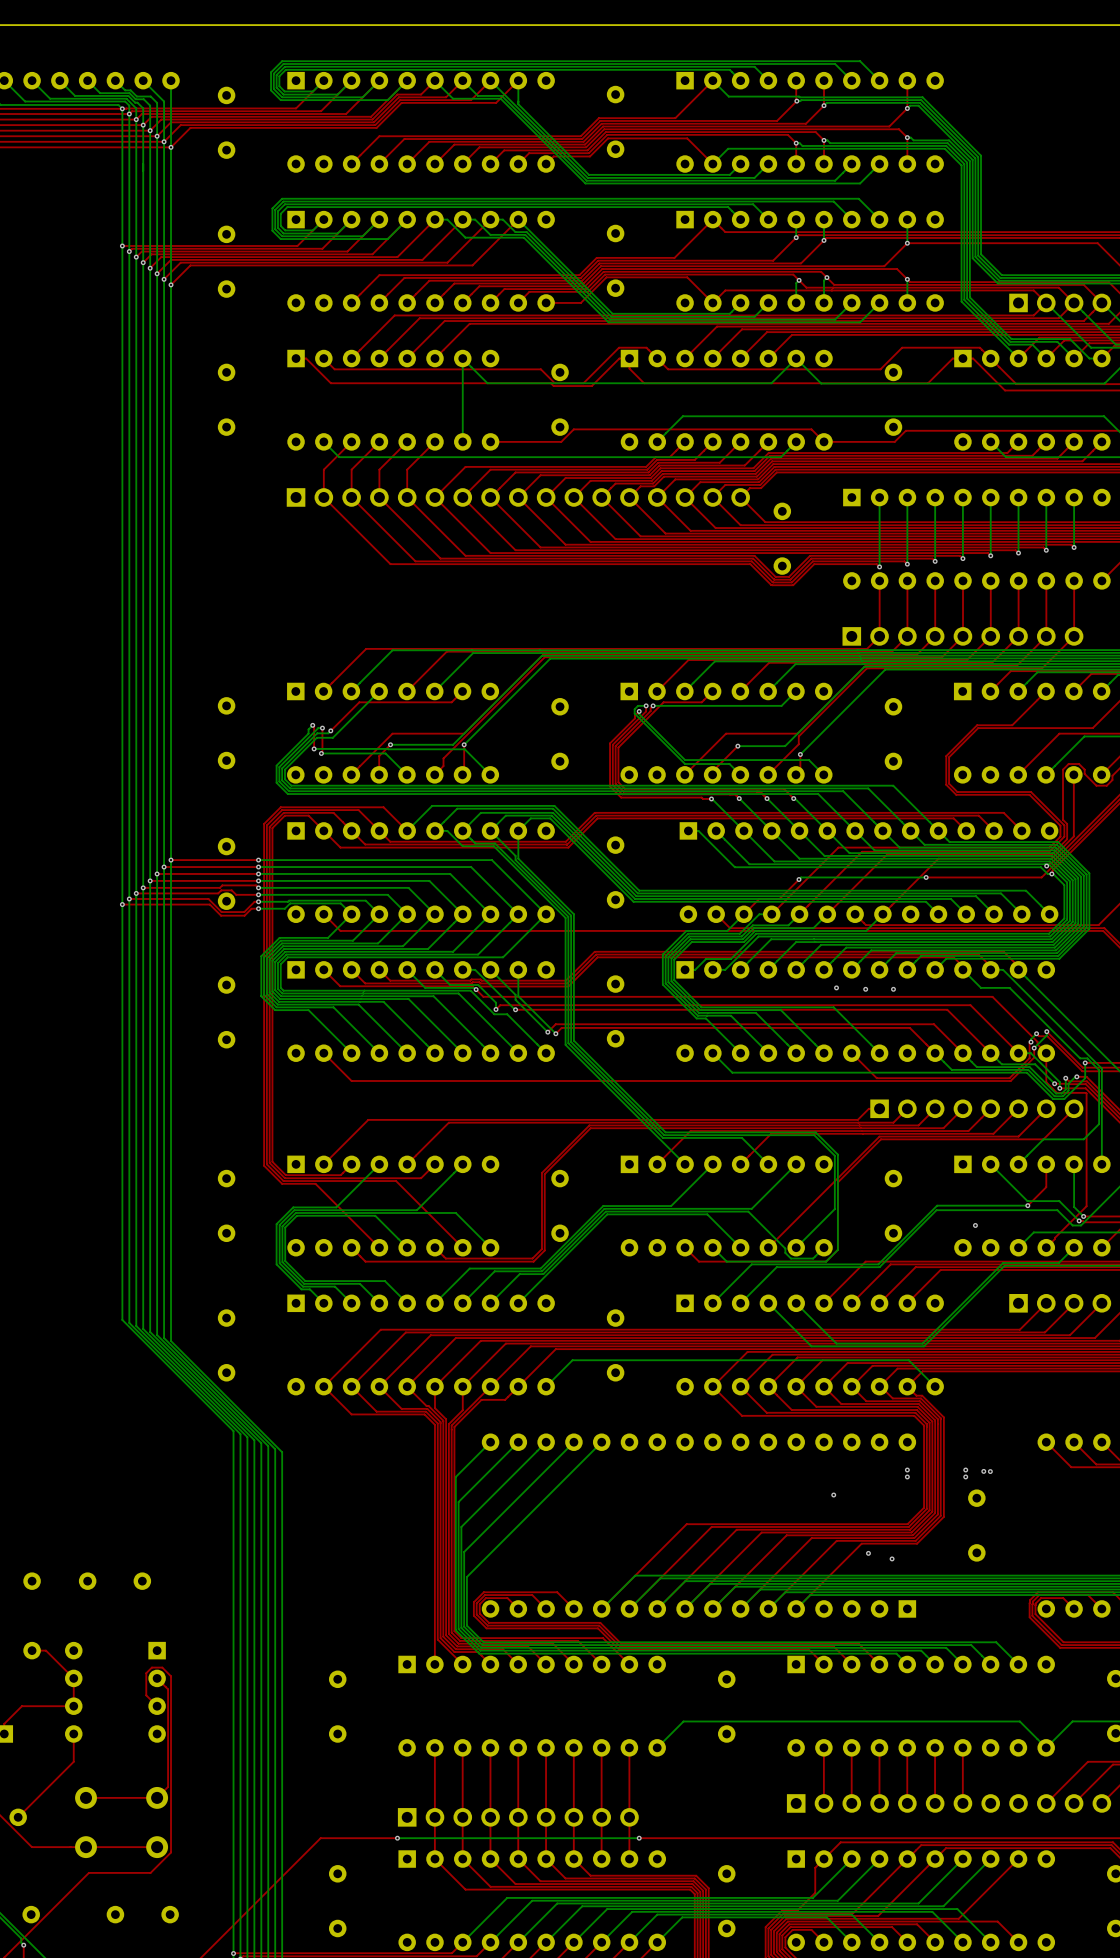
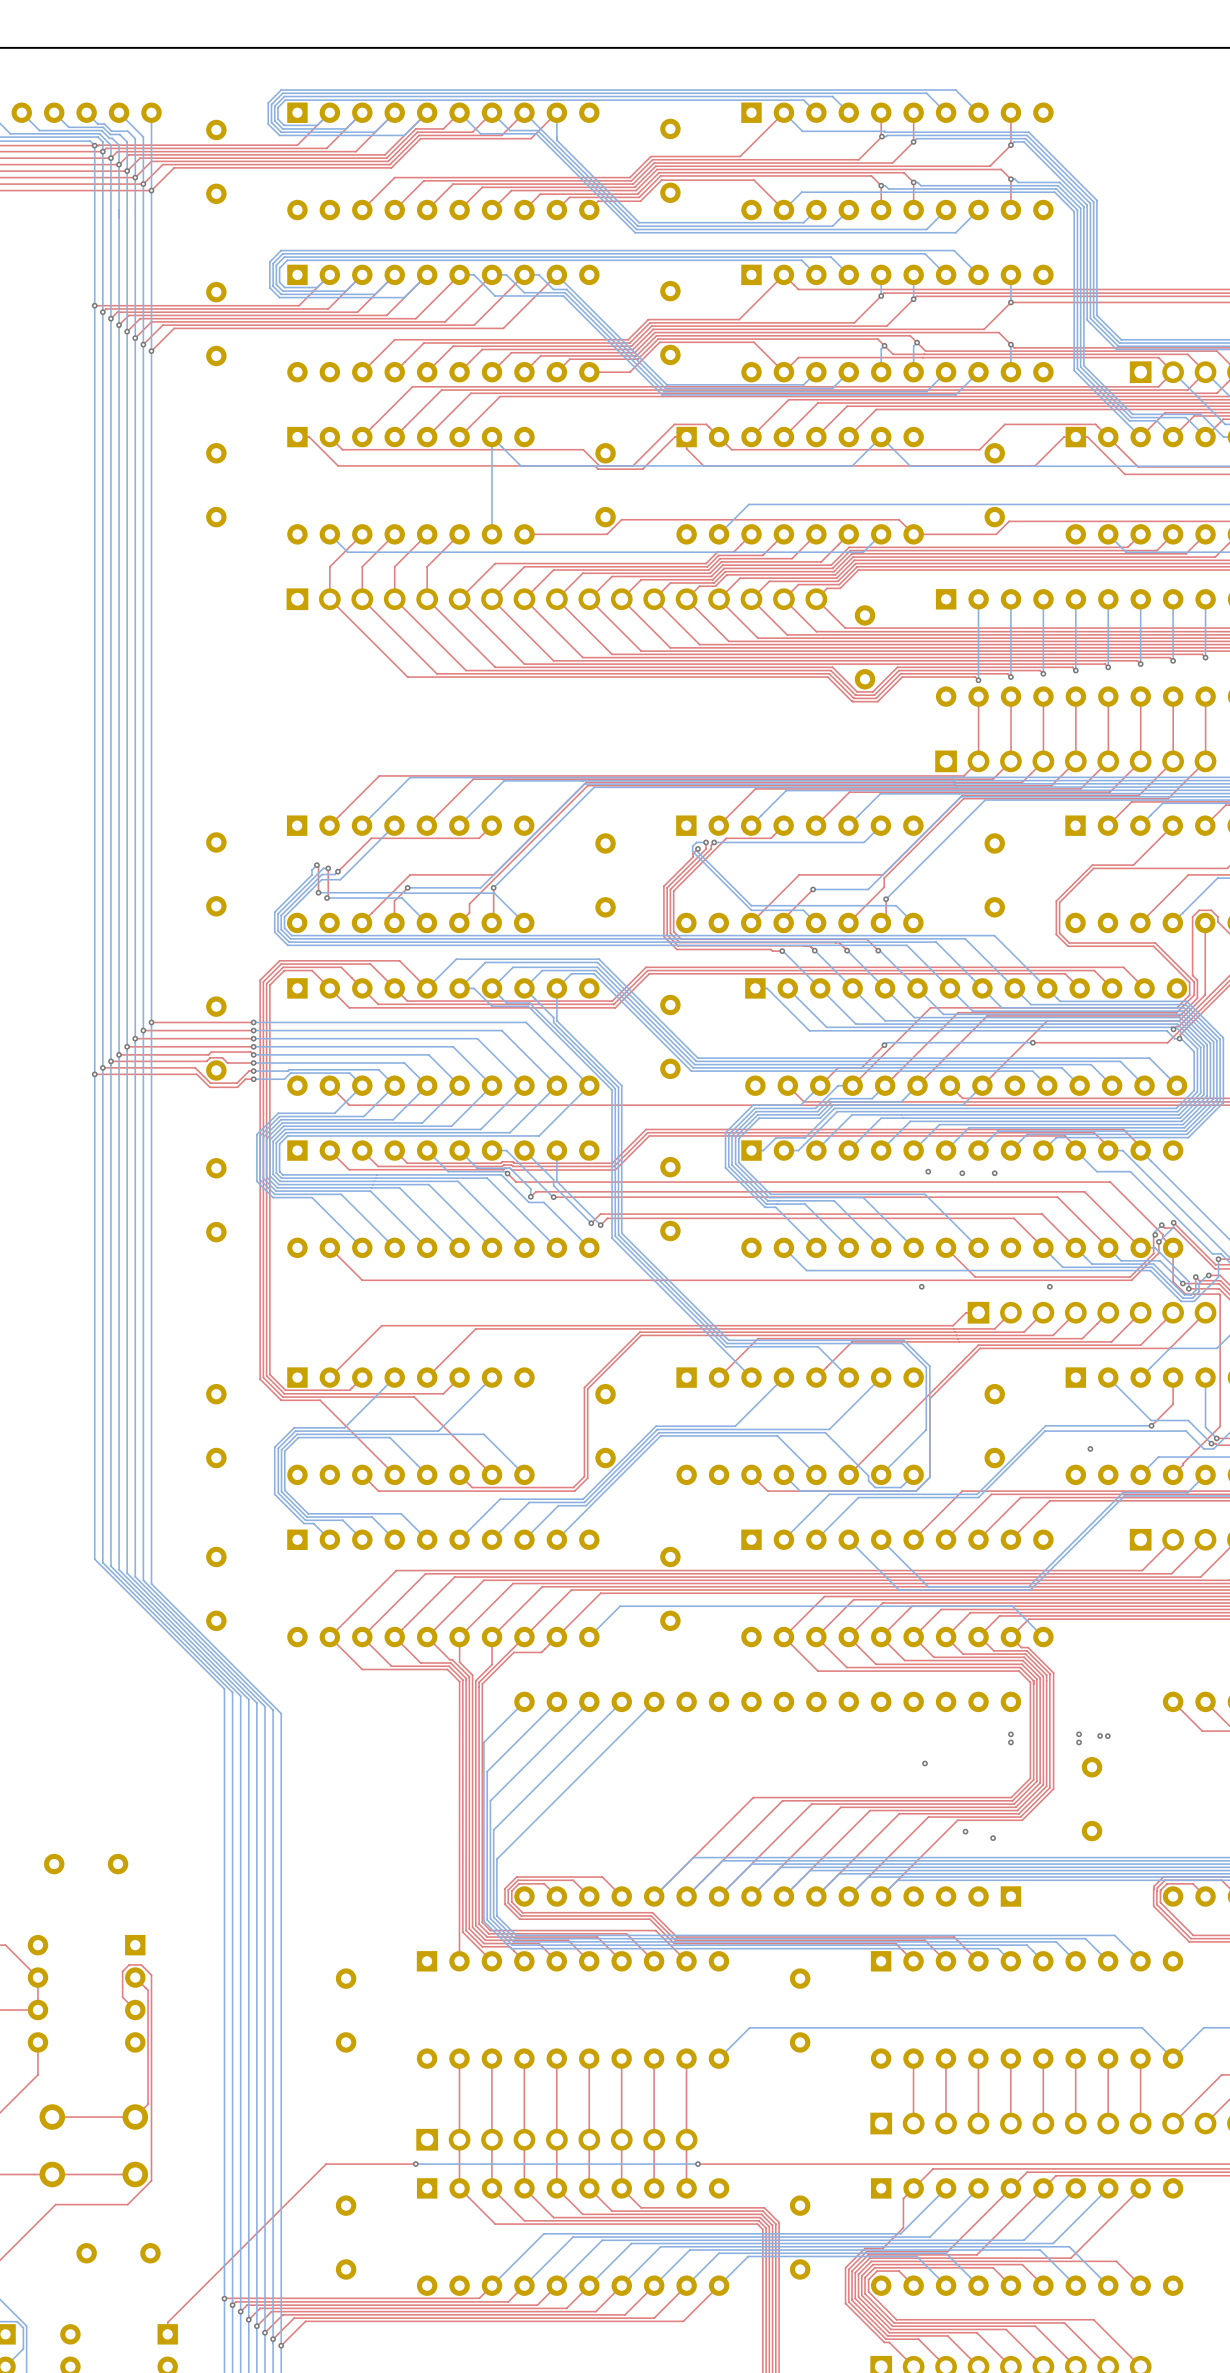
via: none -> (921, 1286)
via: none -> (1049, 1286)
top track: none -> (1108, 2058) (1108, 2123)
top track: none -> (1140, 2058) (1140, 2123)

